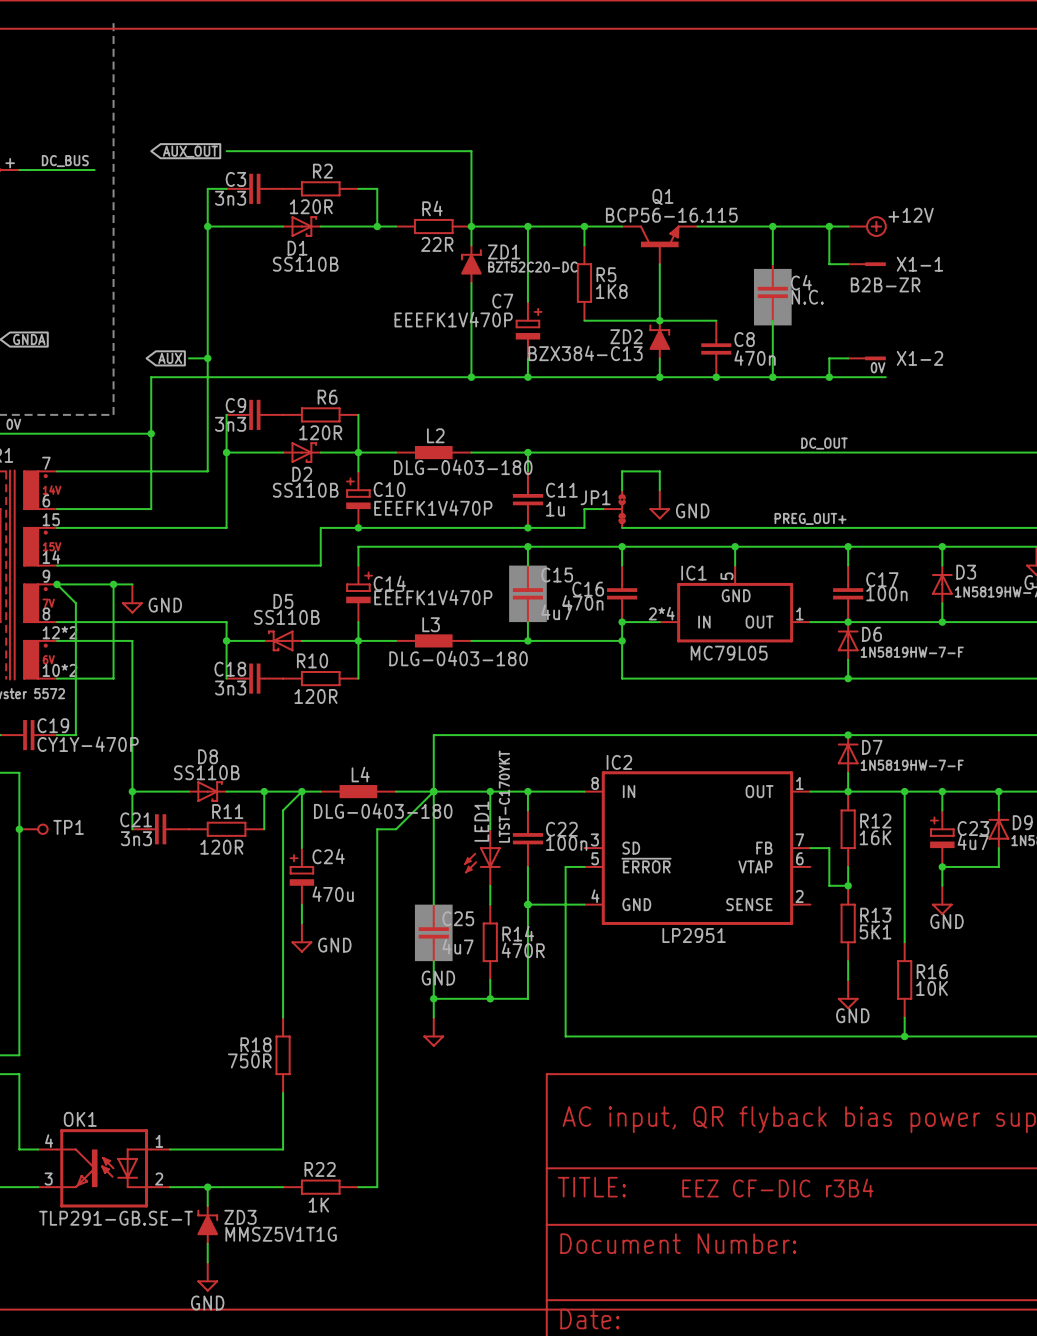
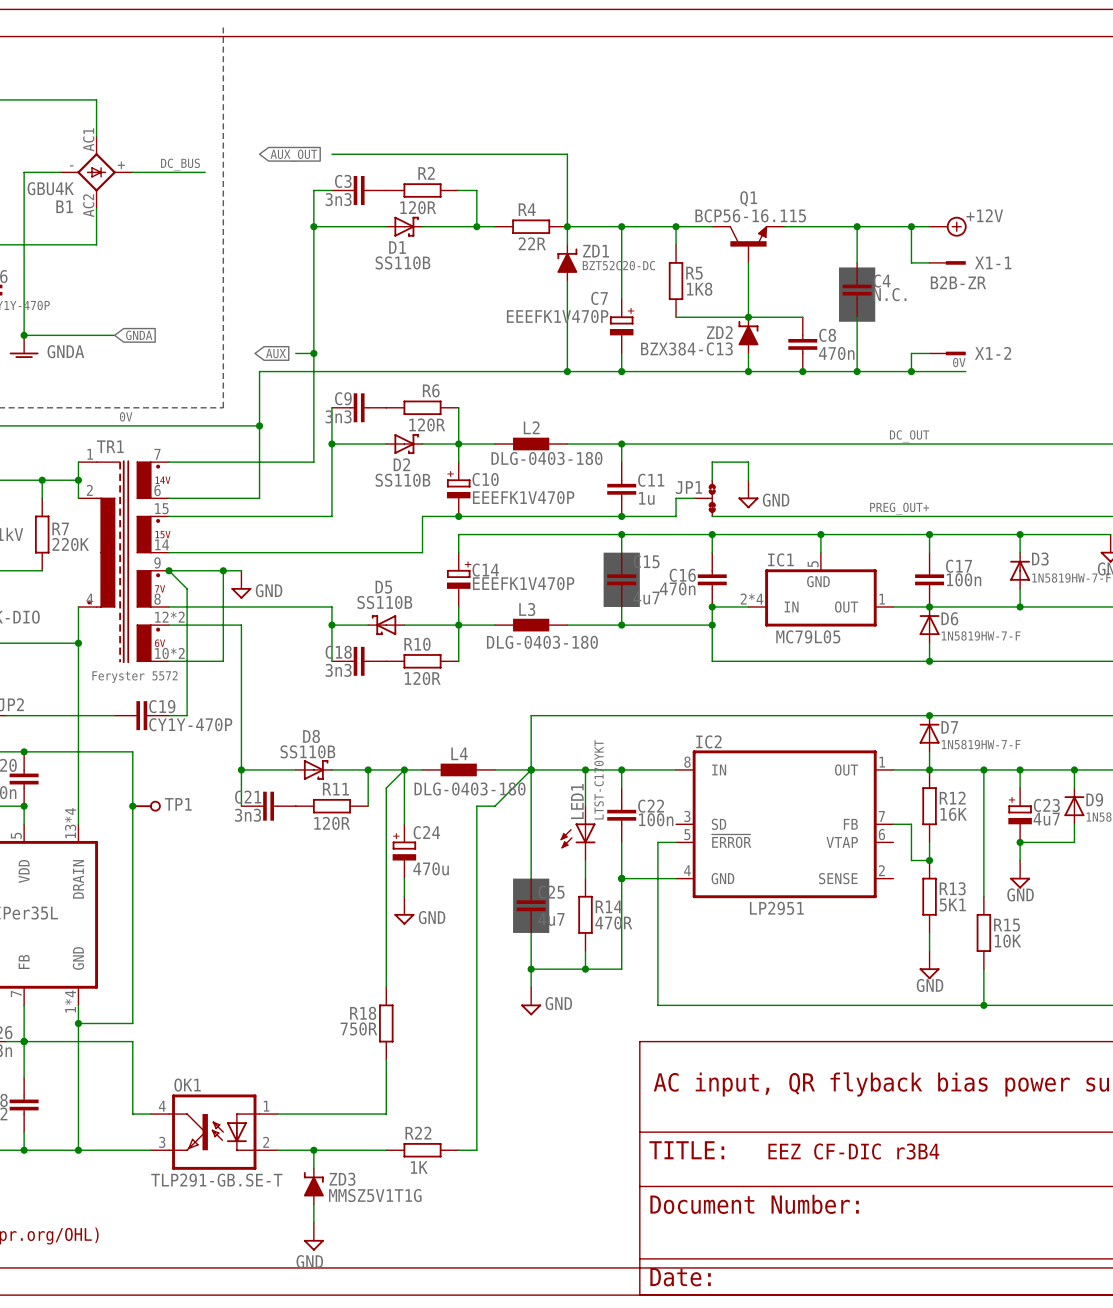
R15: none -> 10K (983, 932)
power symbol text position: GND (438, 978) -> GND (558, 1003)
R16: 10K (904, 979) -> none

